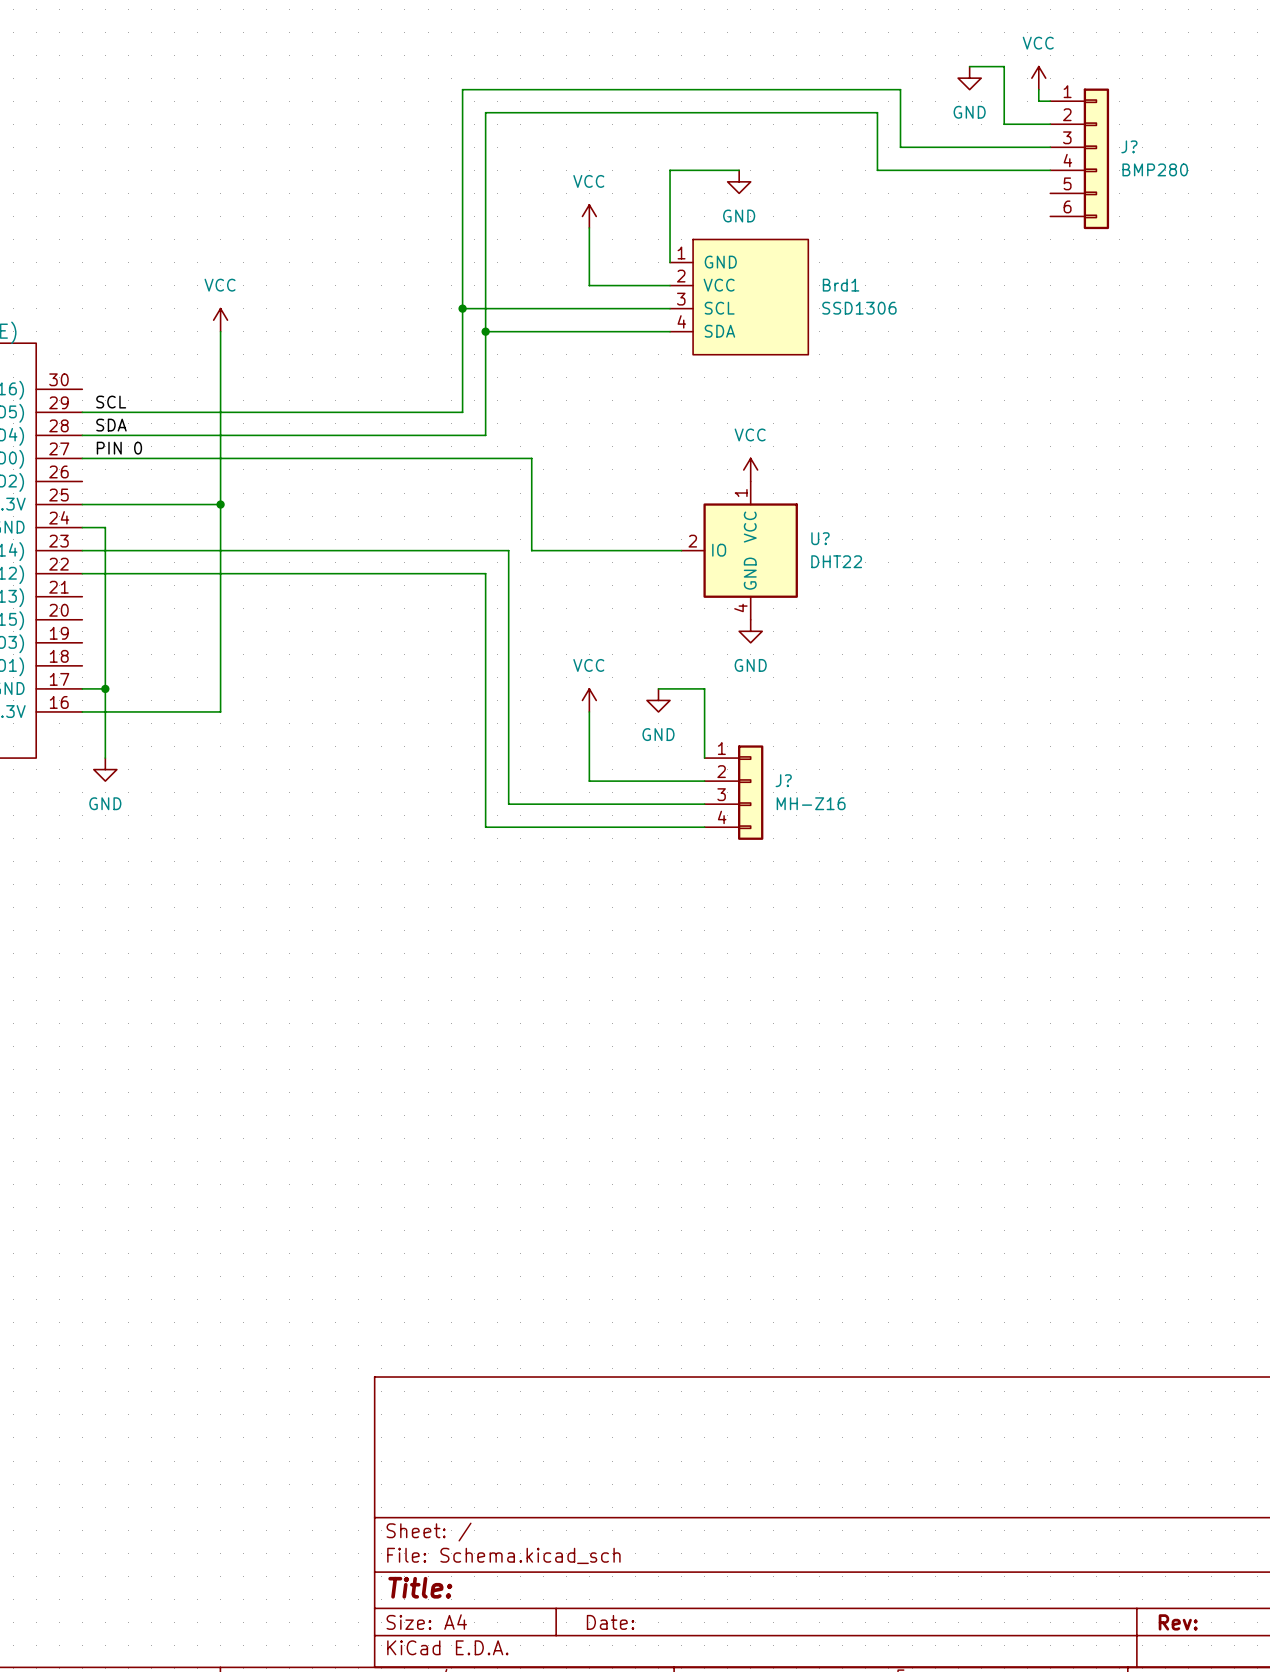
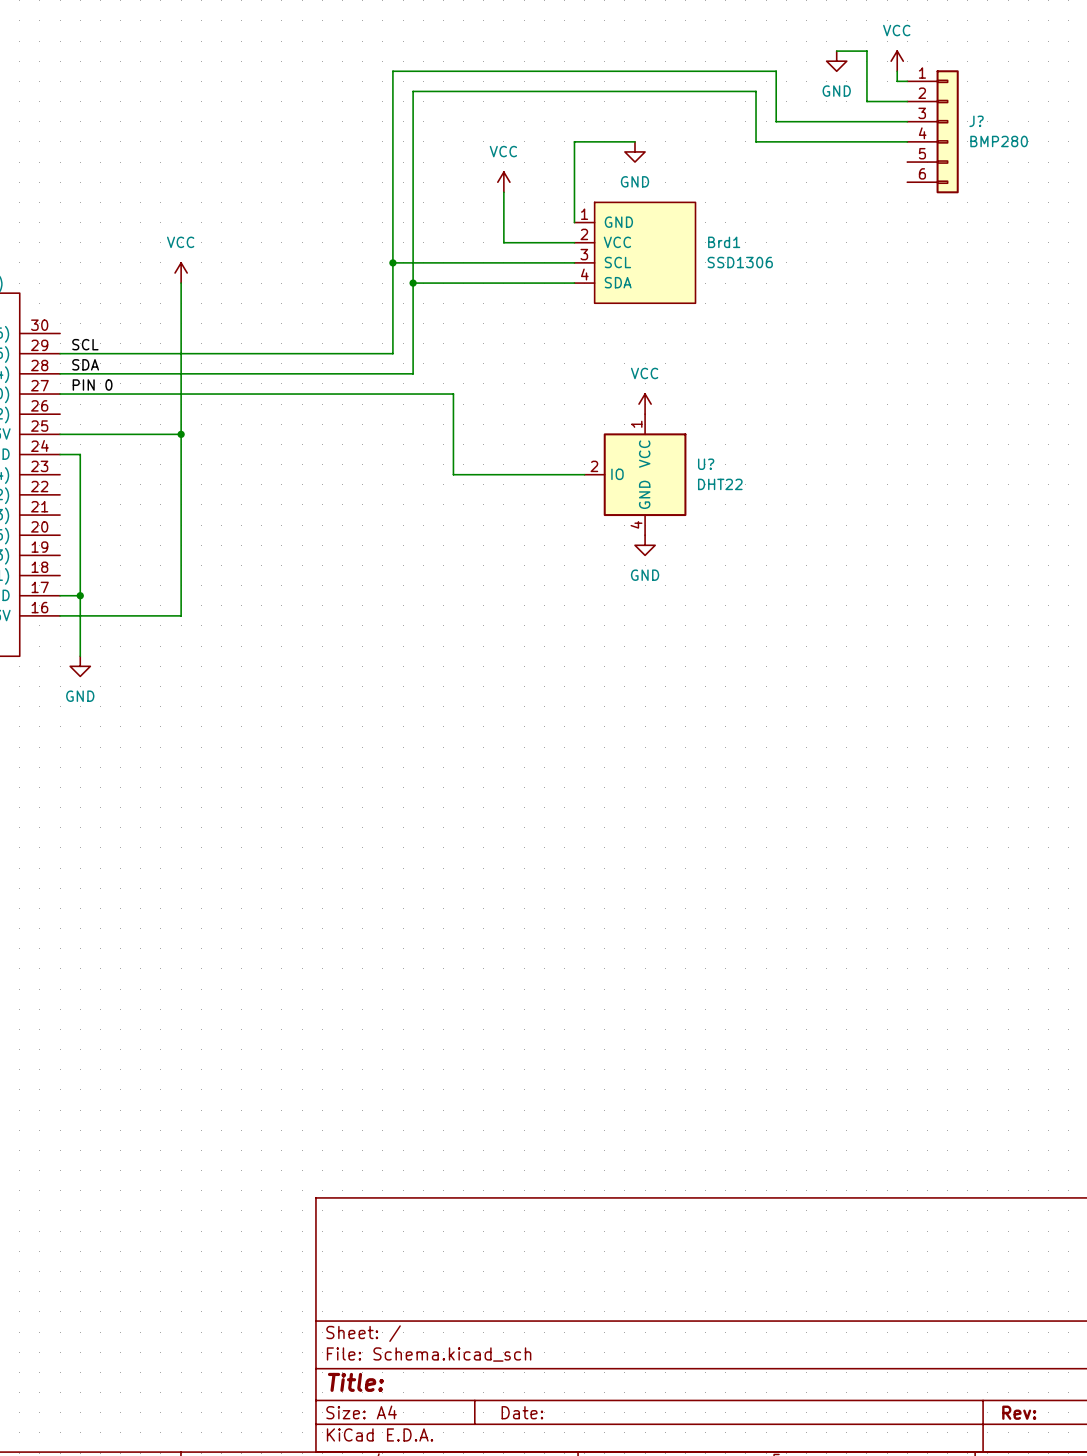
wire: (82, 550) (508, 550) (508, 804) (704, 804) -> none
wire: (82, 573) (485, 573) (485, 827) (704, 827) -> none
wire: (658, 688) (704, 688) (704, 758) -> none
power symbol: VCC (589, 700) -> none
power symbol: GND (658, 700) -> none
wire: (589, 711) (589, 781) (704, 781) -> none
J?: MH-Z16 (733, 792) -> none

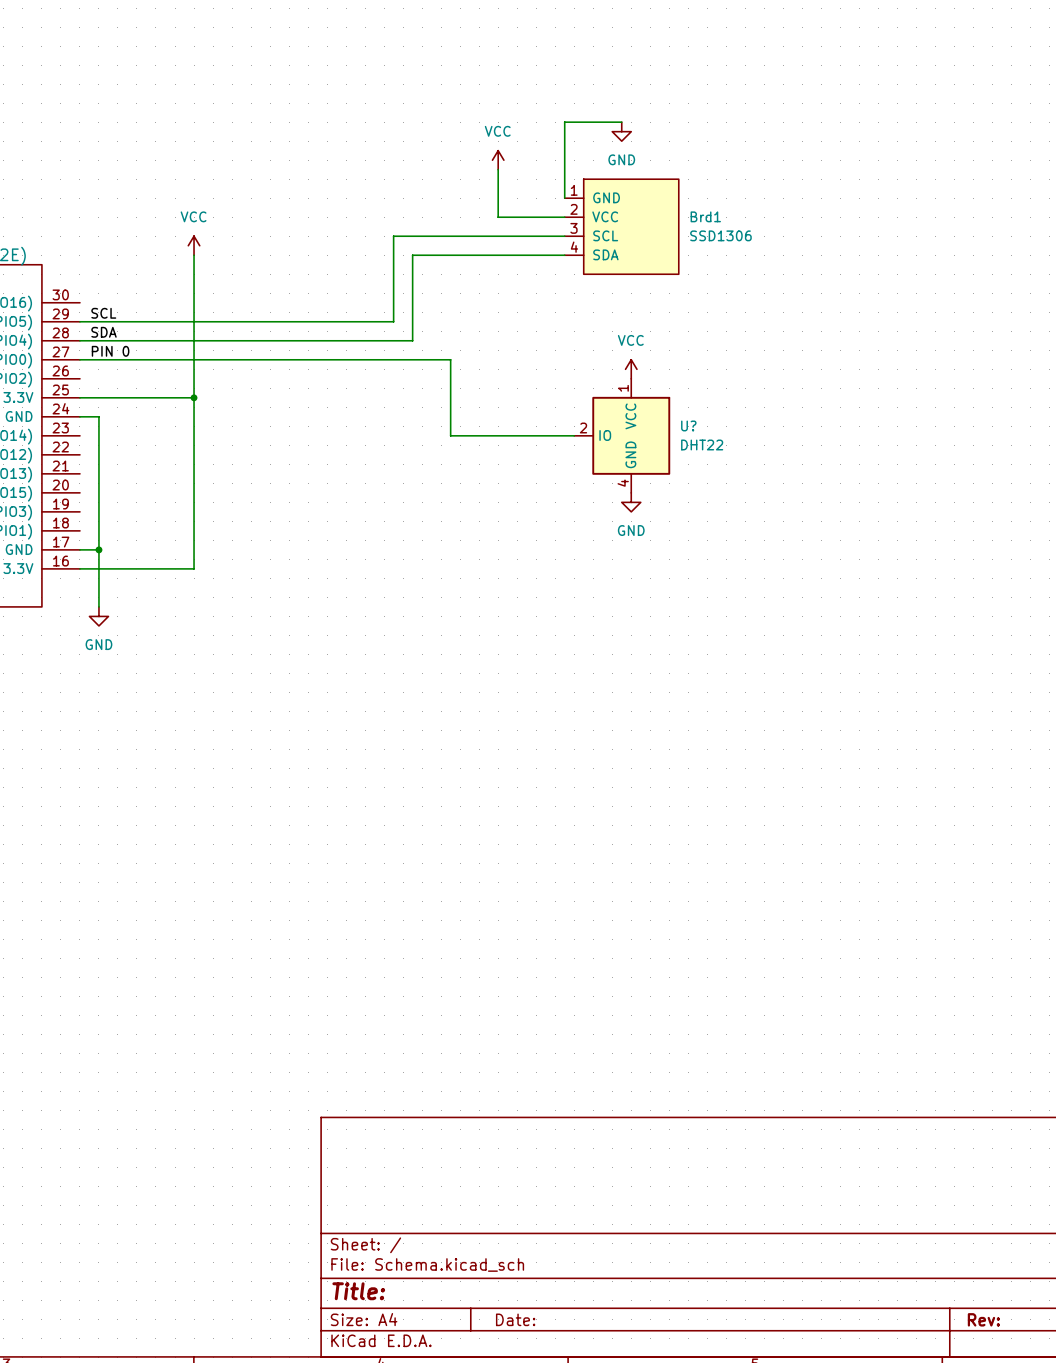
wire: (836, 51) (866, 51) (866, 101) (907, 101) -> none
power symbol: GND (836, 61) -> none
power symbol: VCC (897, 61) -> none
wire: (897, 71) (897, 81) (907, 81) -> none
wire: (907, 121) (776, 121) (776, 71) (392, 71) (392, 262) -> none
J?: BMP280 (933, 131) -> none
wire: (907, 141) (756, 141) (756, 91) (413, 91) (413, 283) -> none
junction: (392, 262) -> none
junction: (413, 283) -> none

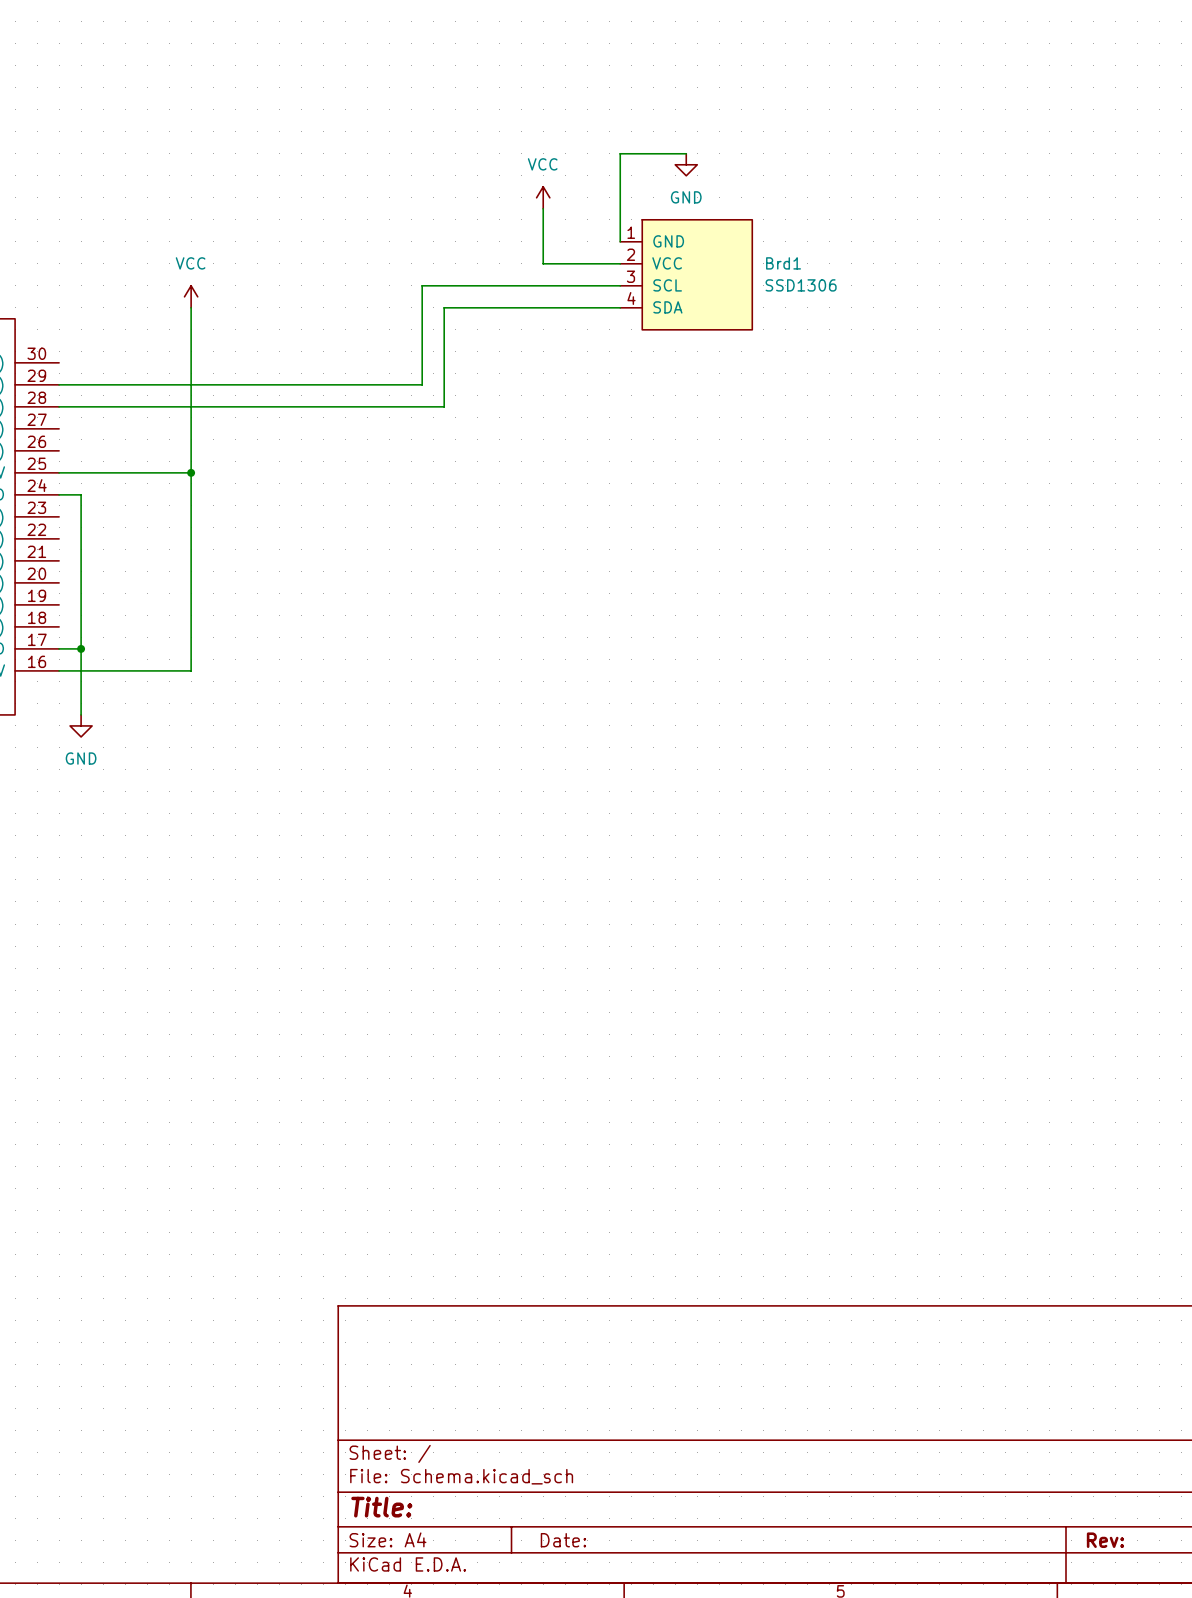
label: SCL (103, 313) -> none
label: SDA (104, 332) -> none
label: PIN 0 (110, 351) -> none
wire: (79, 359) (450, 359) (450, 435) (574, 435) -> none
power symbol: VCC (631, 369) -> none
U?: DHT22 (622, 435) -> none
power symbol: GND (631, 502) -> none

